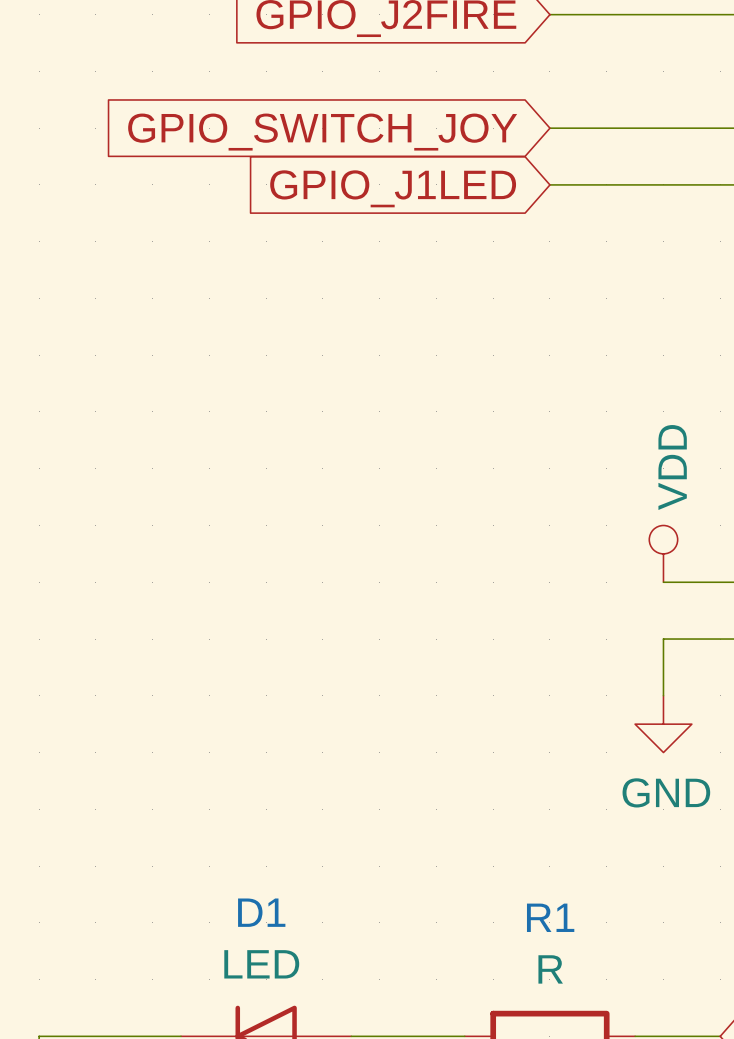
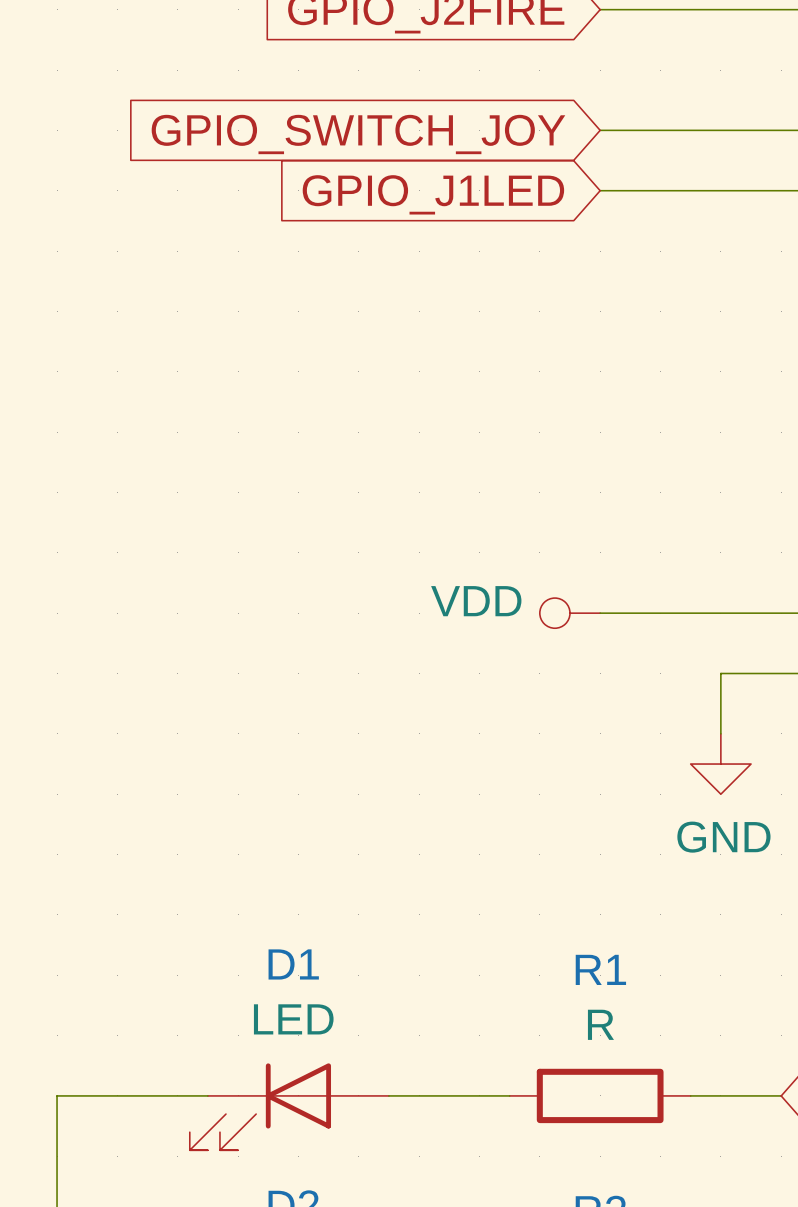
power symbol rotation: 0° (663, 553) -> 90° counterclockwise (569, 613)
power symbol position: VDD (663, 553) -> VDD (569, 613)
wire: none -> (600, 613) (720, 613)

